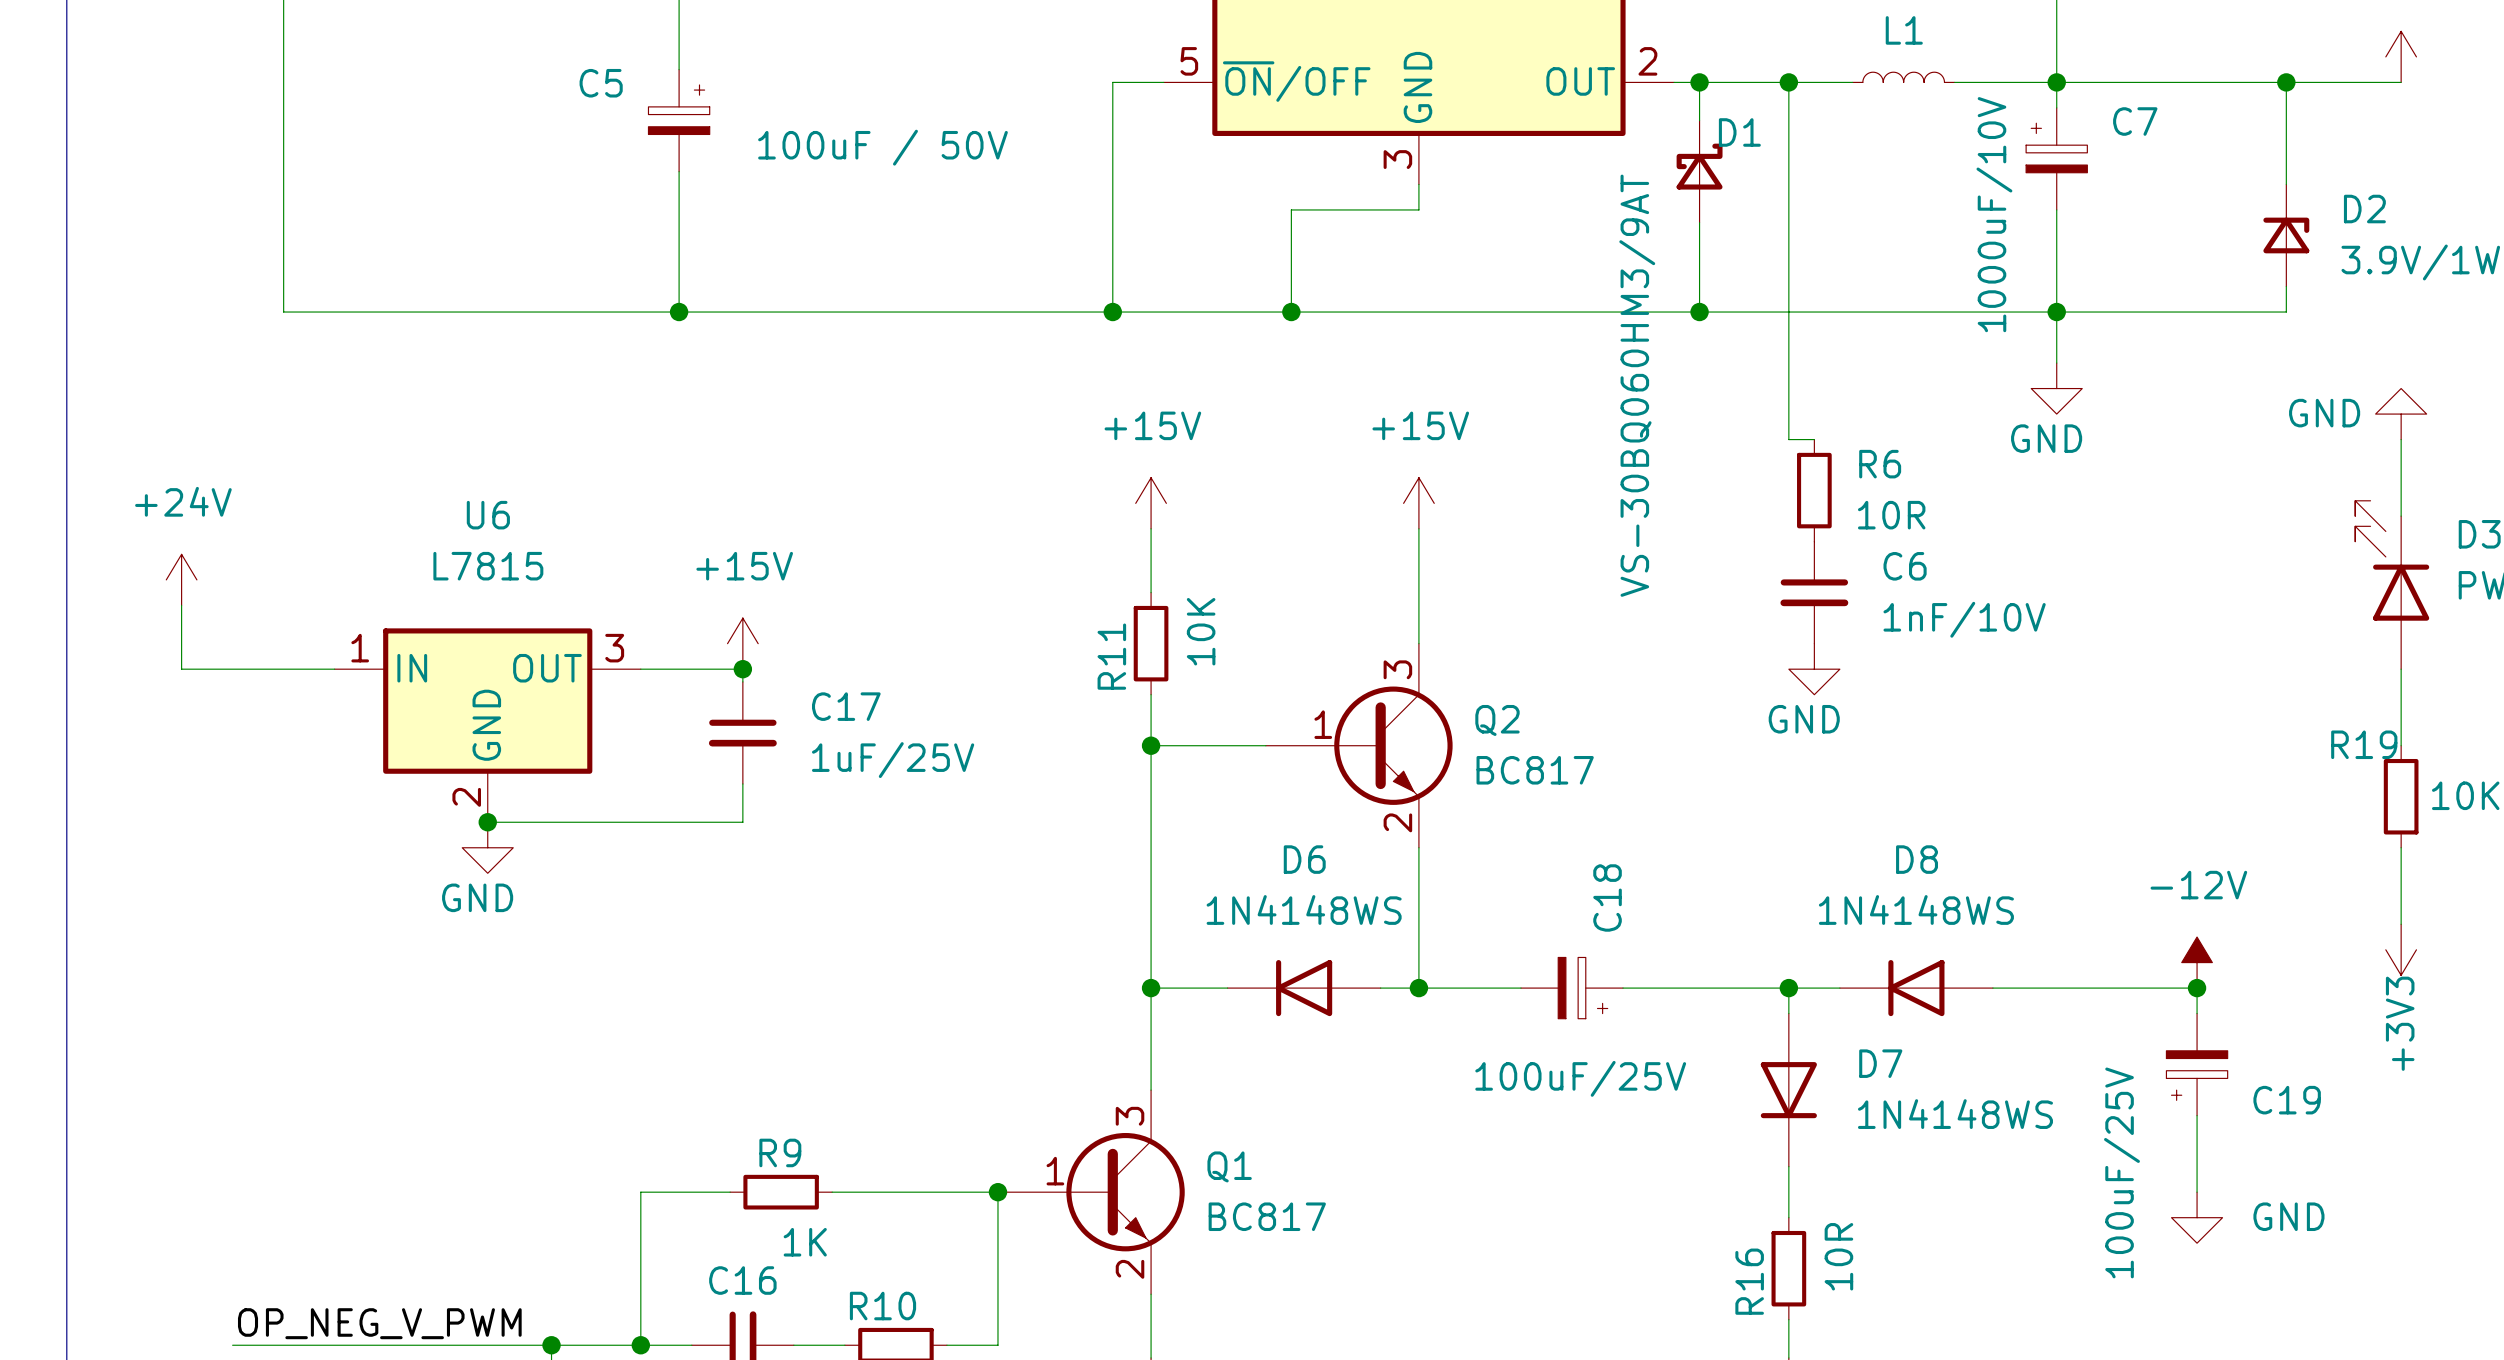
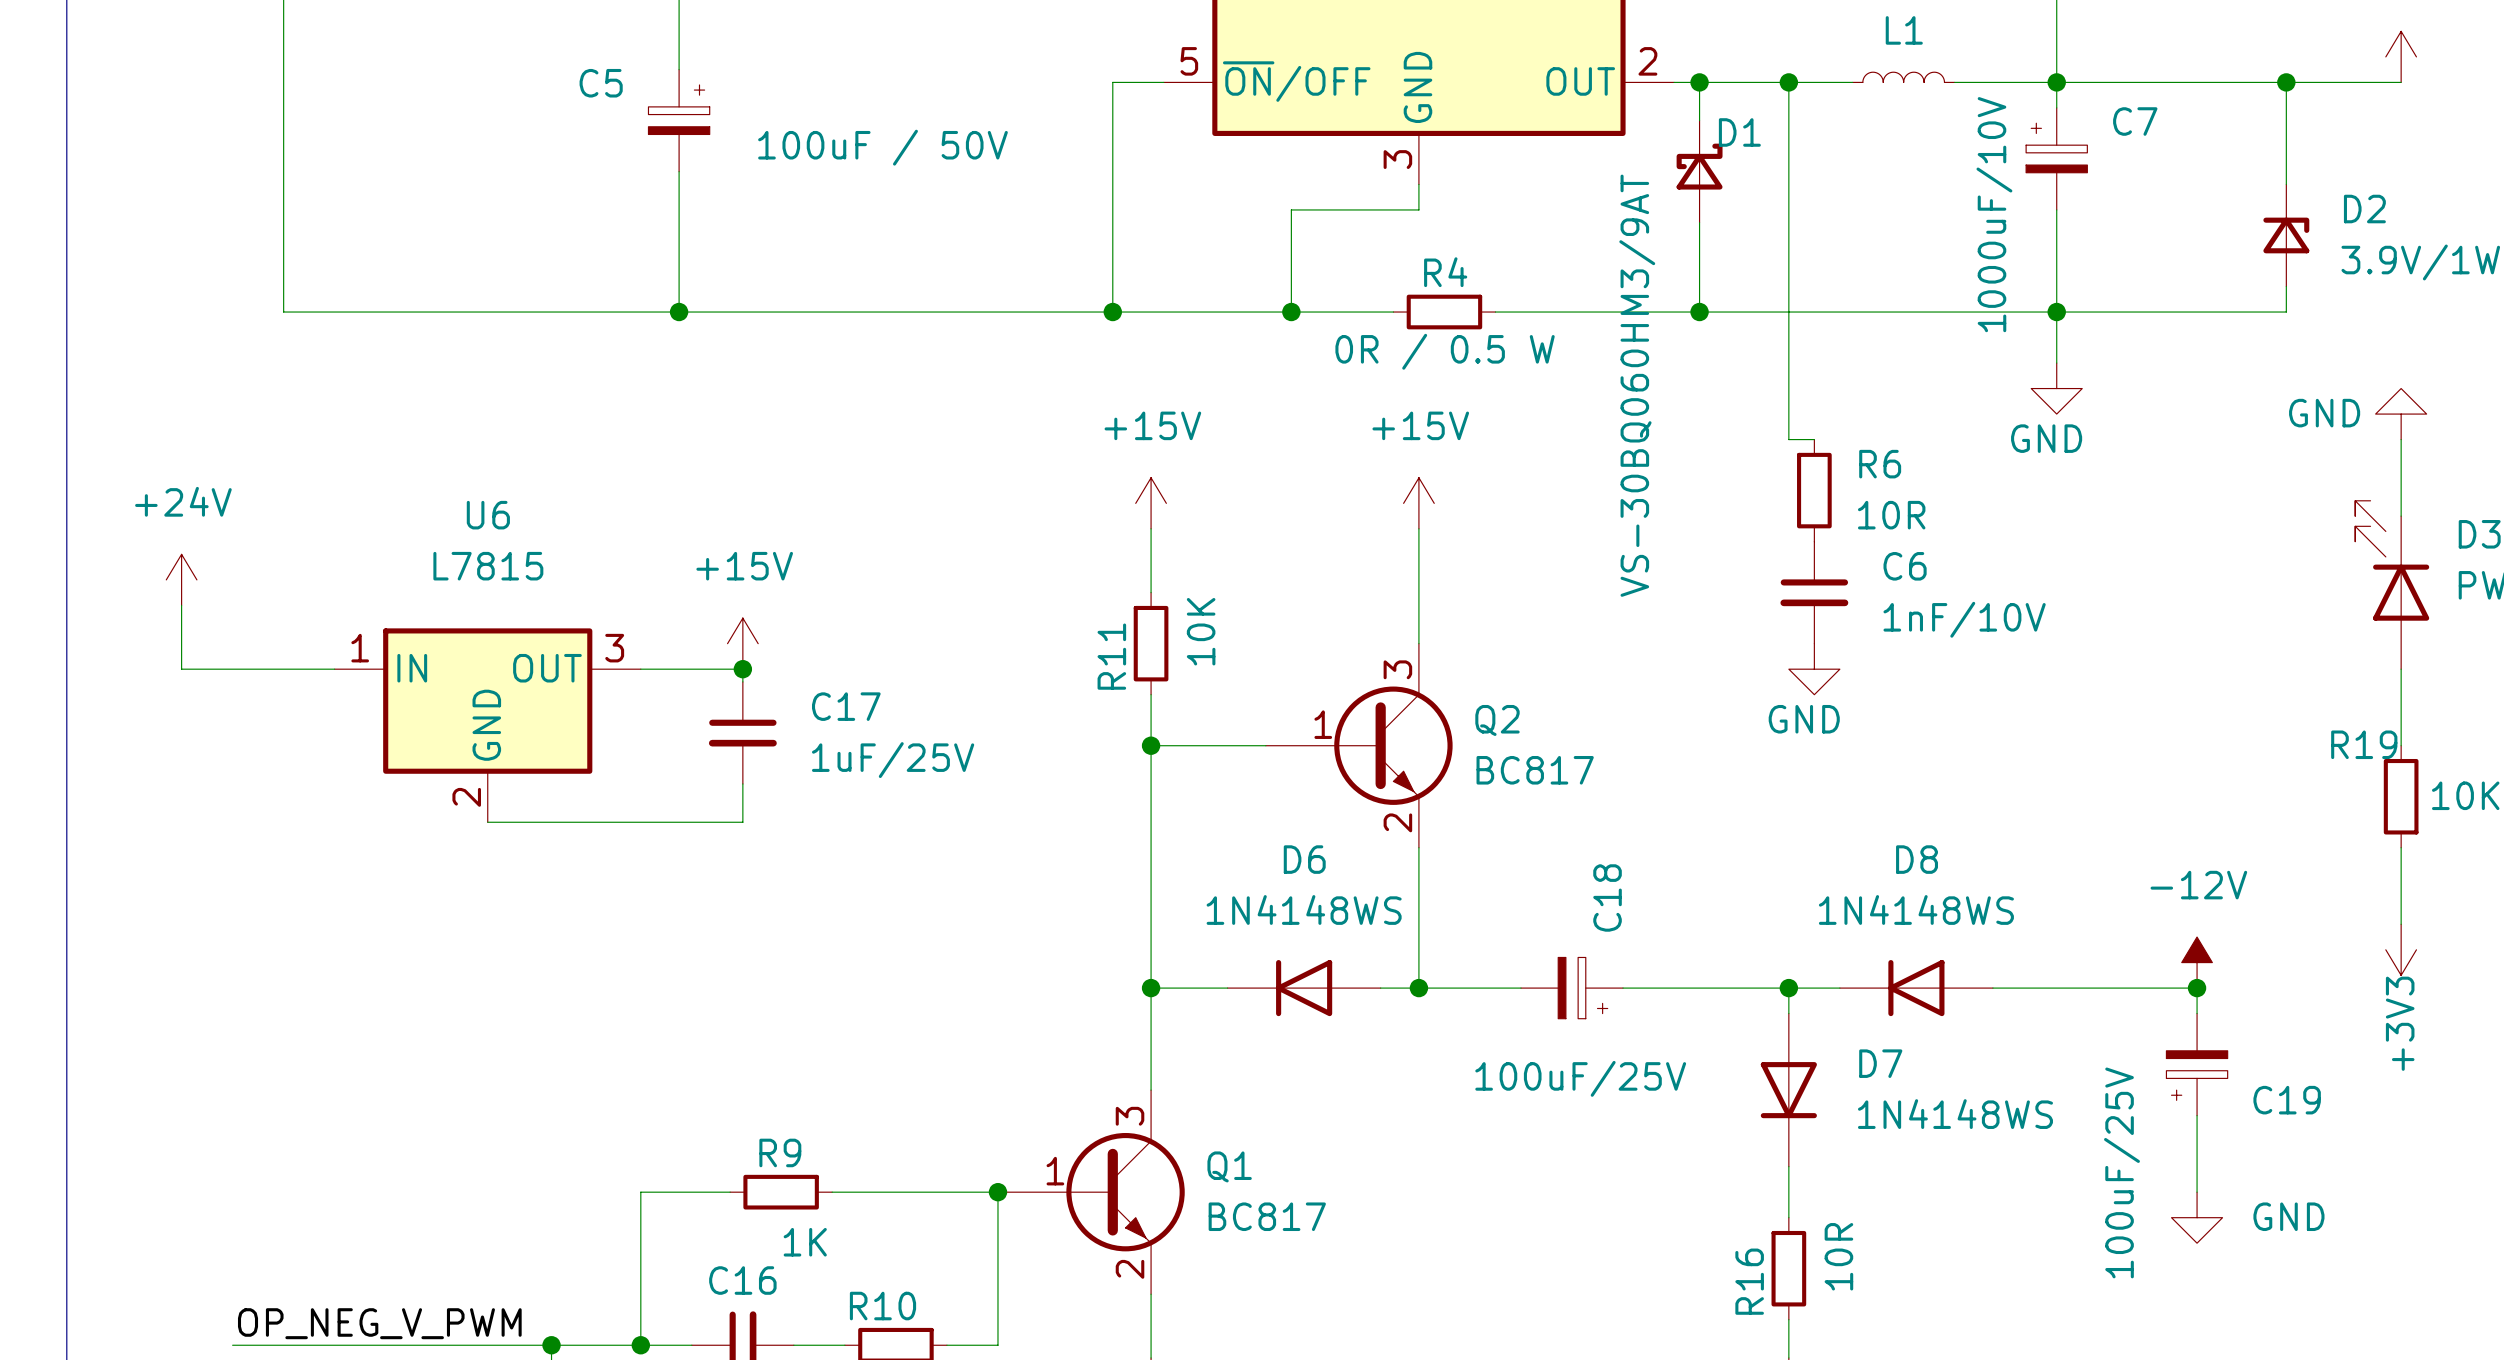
wire: (1393, 312) (1495, 312) -> none
R4: none -> 0R / 0.5 W (1444, 312)
junction: (487, 822) -> none
power symbol: GND (487, 847) -> none

